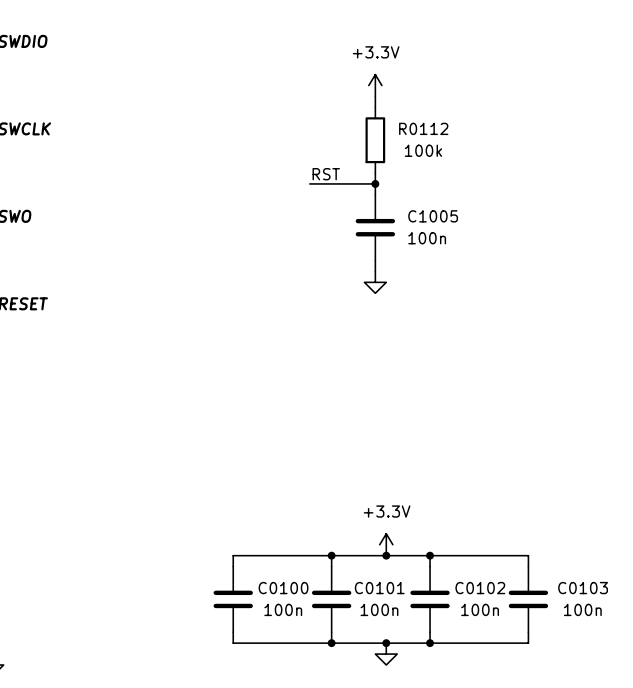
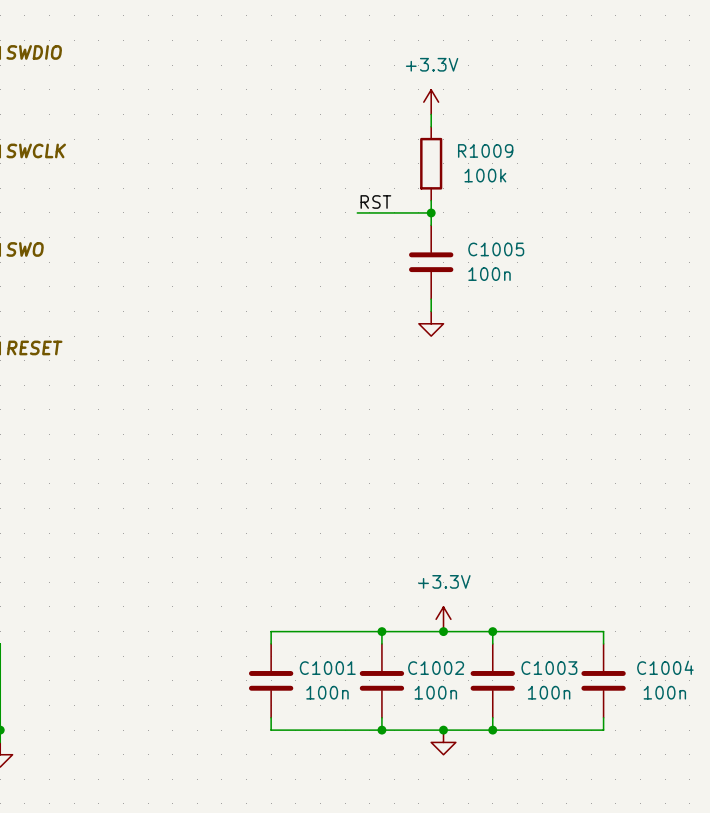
R0112 name: R0112 (423, 128) -> R1009 (485, 150)
C0100 name: C0100 (283, 588) -> C1001 (327, 668)
C0101 name: C0101 (379, 588) -> C1002 (436, 668)
C0102 name: C0102 (480, 588) -> C1003 (549, 668)
C0103 name: C0103 (583, 588) -> C1004 (665, 667)

